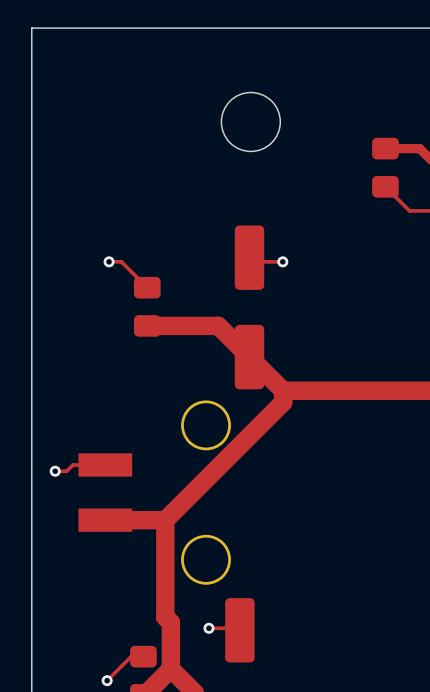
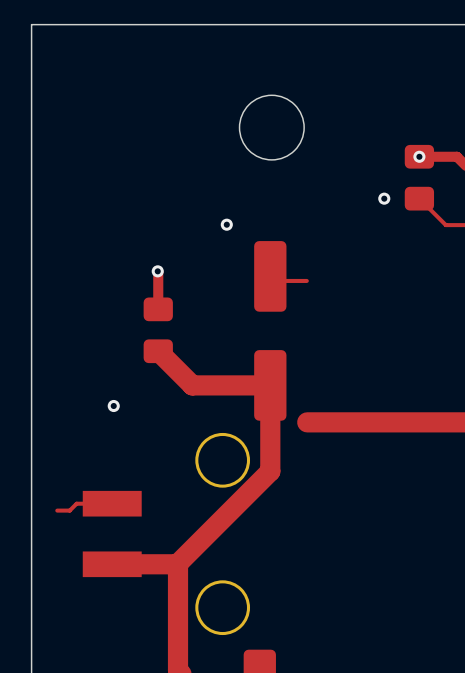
via: none -> (419, 156)
via: none -> (384, 198)
via: none -> (226, 224)
top track: (109, 261) (121, 261) (147, 287) -> (157, 271) (158, 309)
via position: (109, 261) -> (157, 271)
via: (282, 261) -> none
top track: (147, 325) (218, 325) (283, 390) (283, 402) (165, 520) -> (158, 351) (192, 385) (270, 385) (270, 471) (177, 564)
via: none -> (113, 406)
via: (55, 471) -> none

